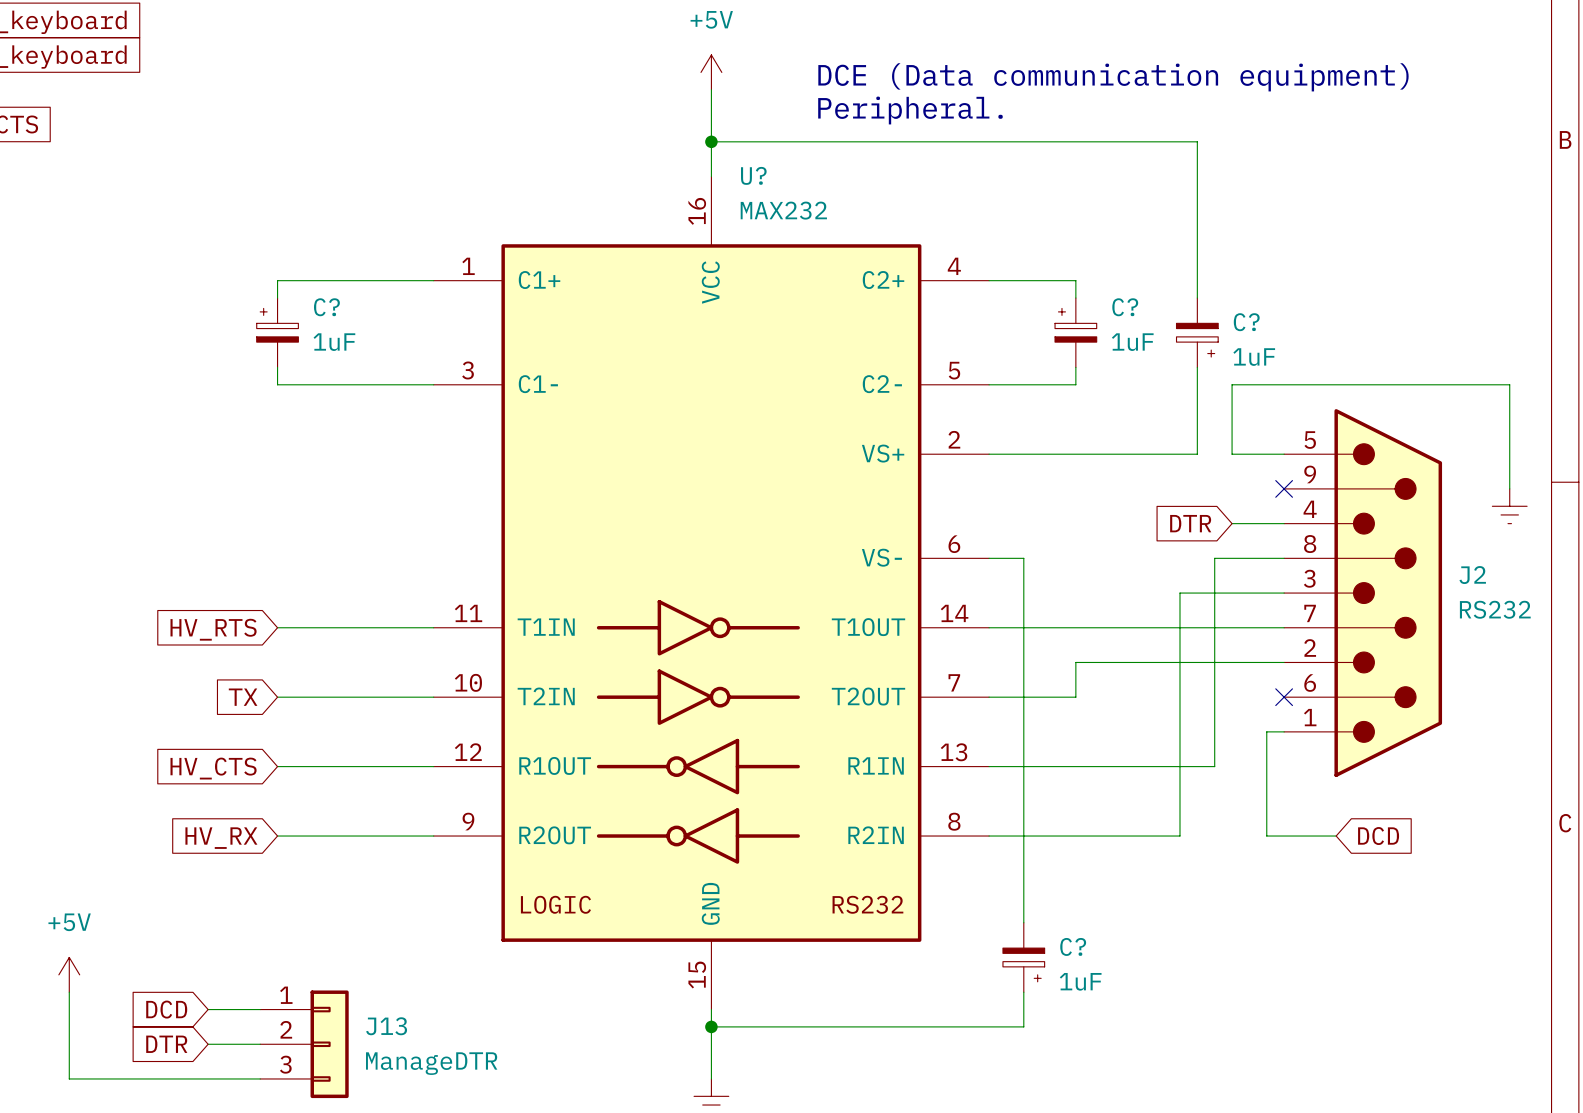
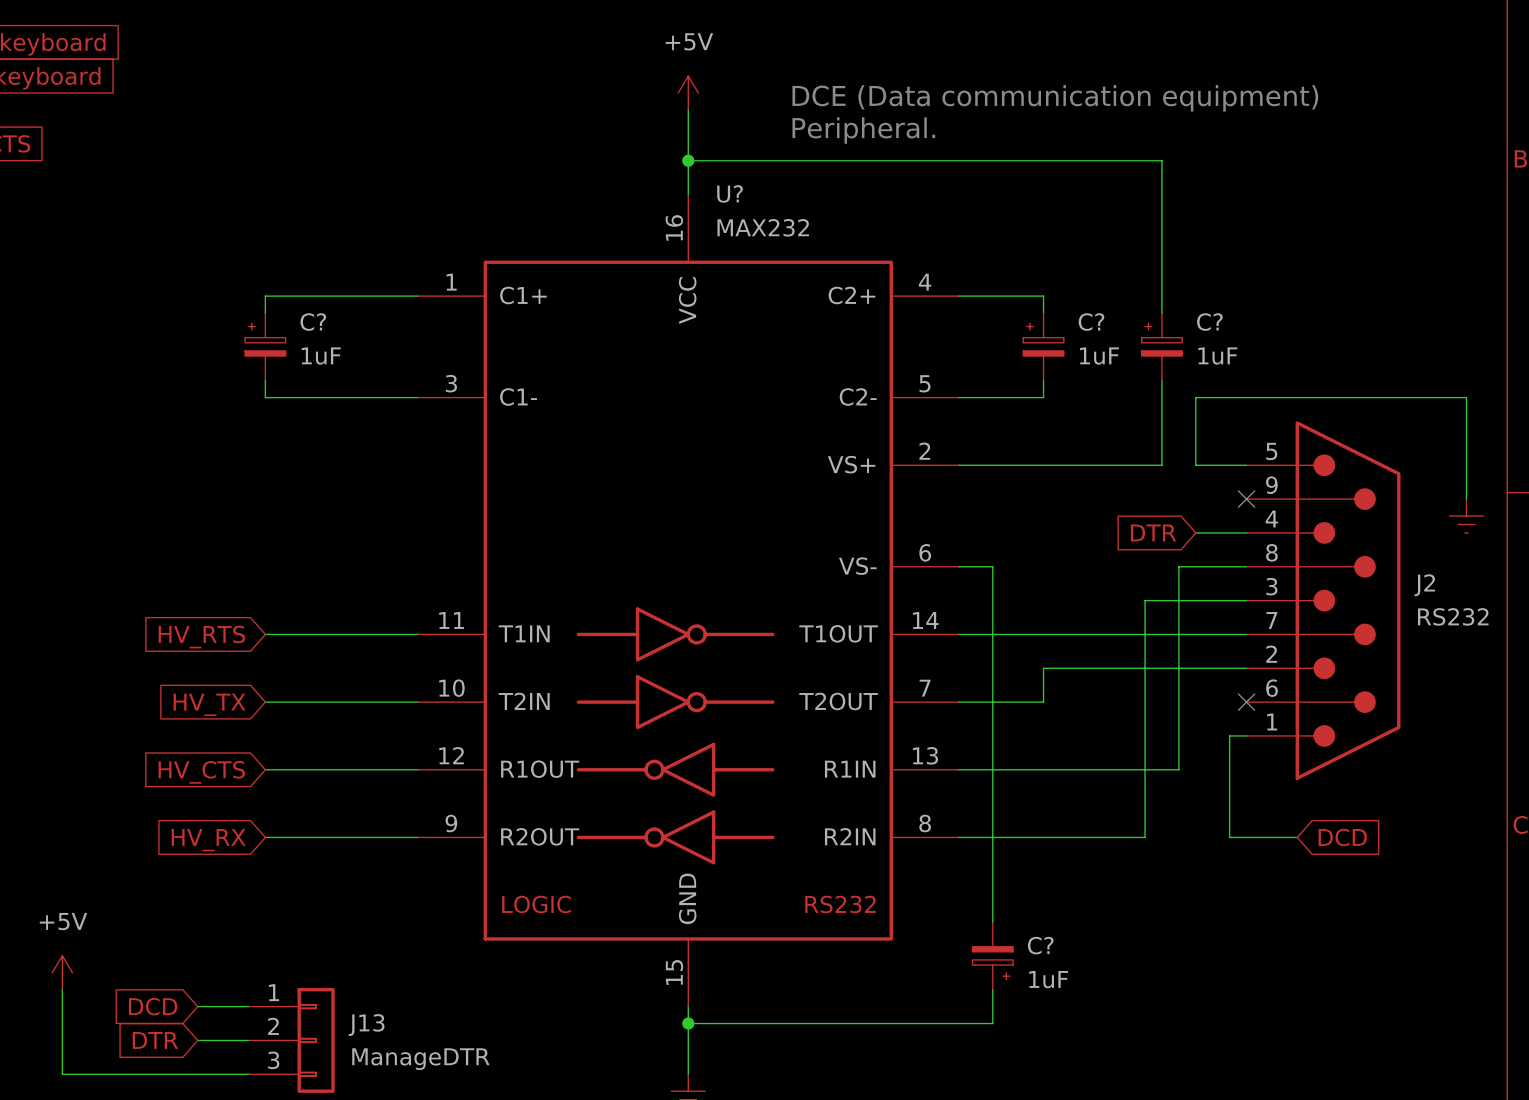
C? rotation: 0° (1197, 340) -> 180° (1161, 339)
global label: TX (243, 697) -> HV_TX (209, 704)

